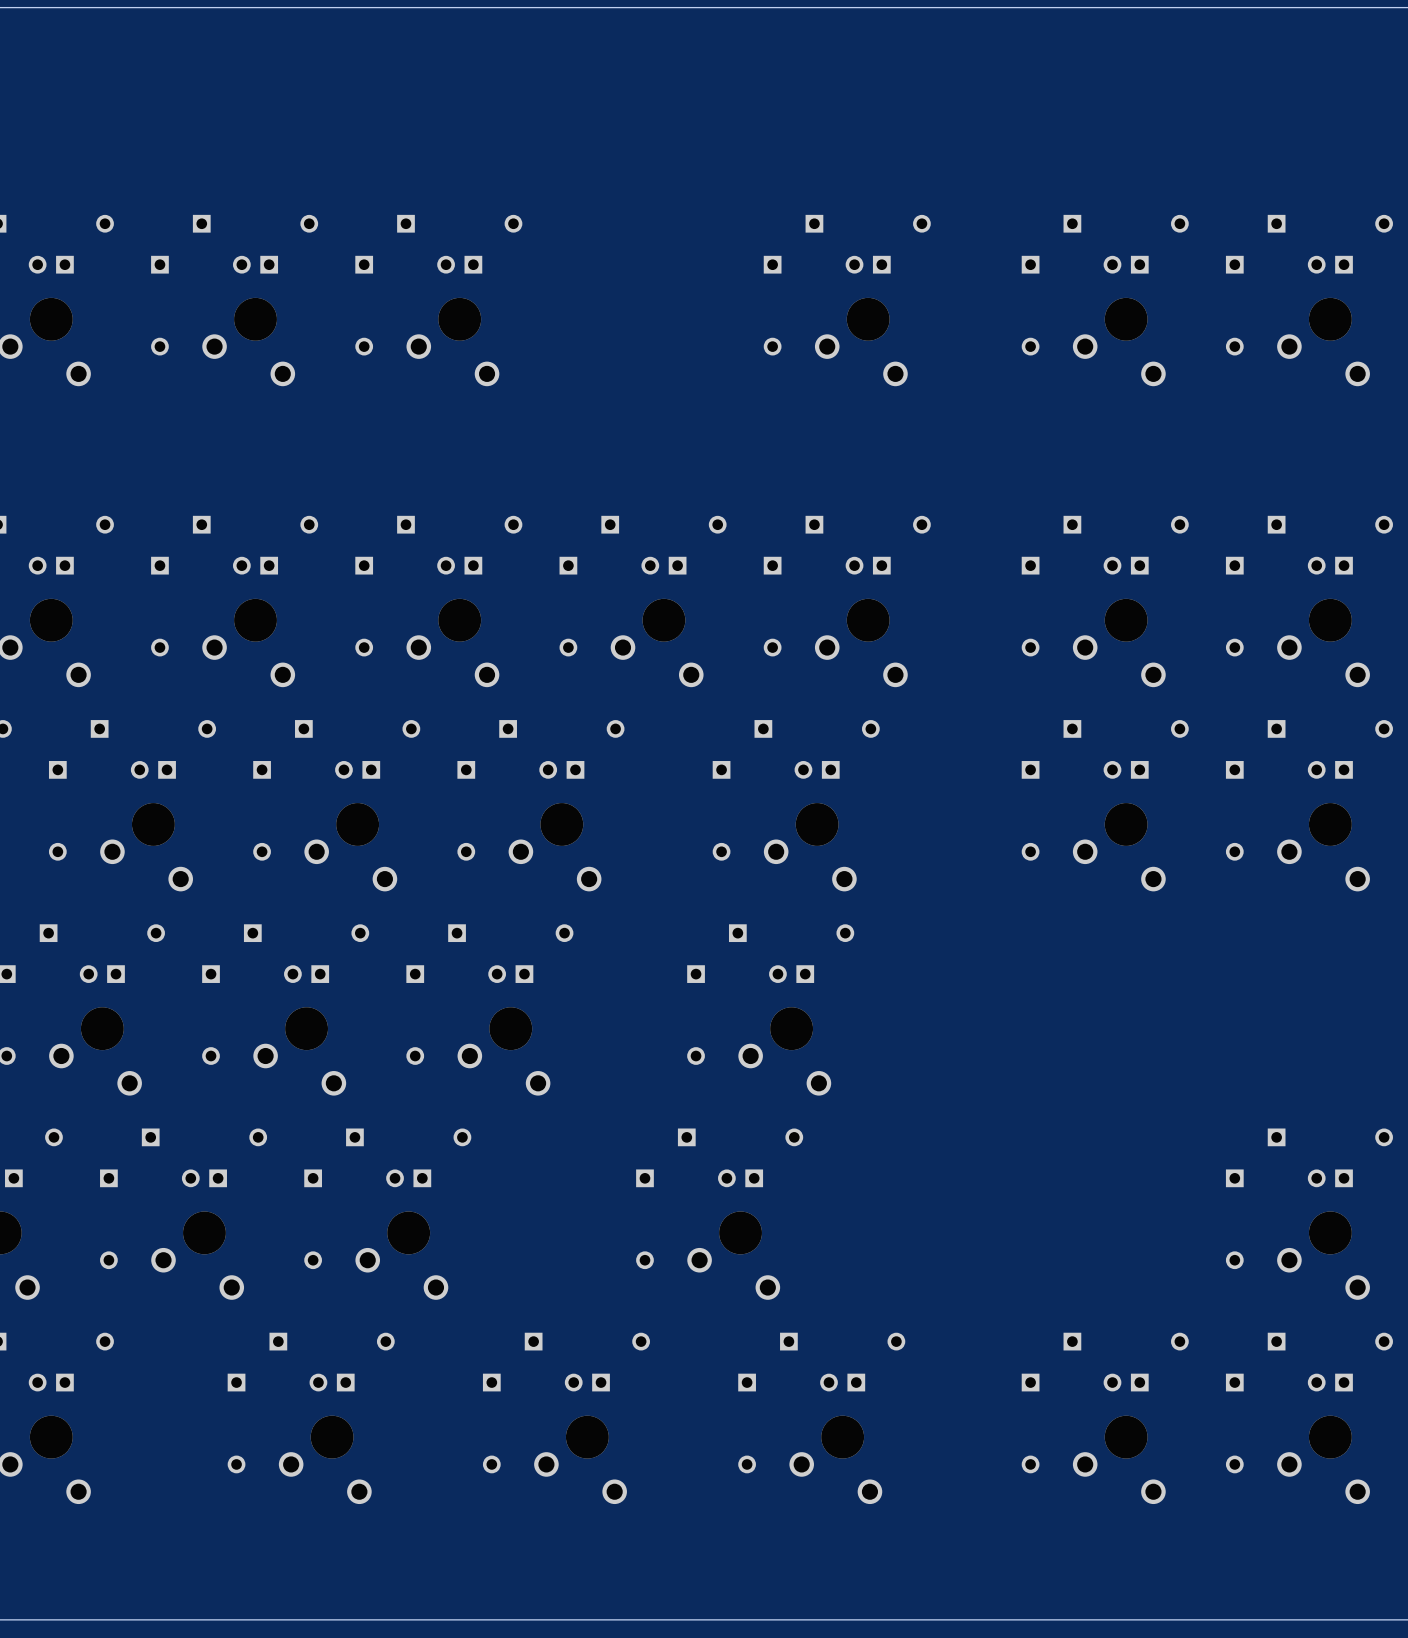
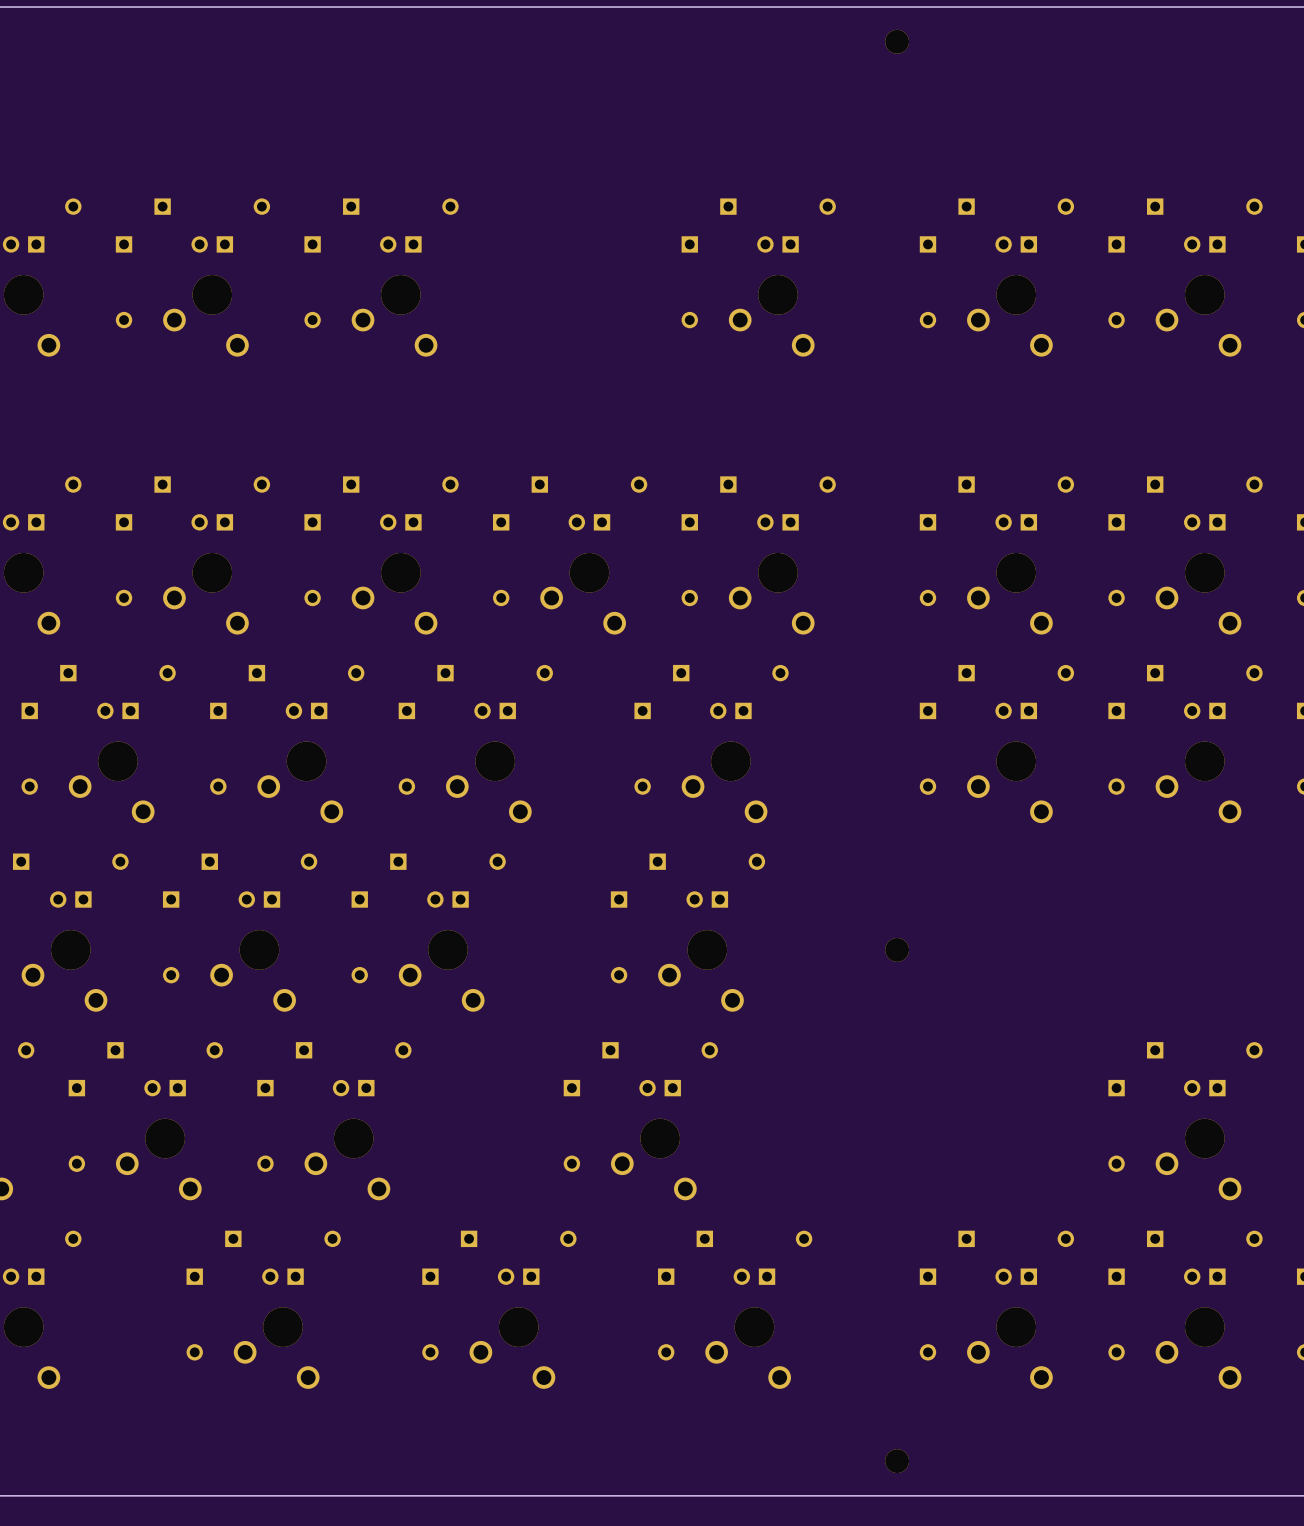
part: none -> (897, 41)
part: none -> (897, 949)
part: none -> (897, 1461)

